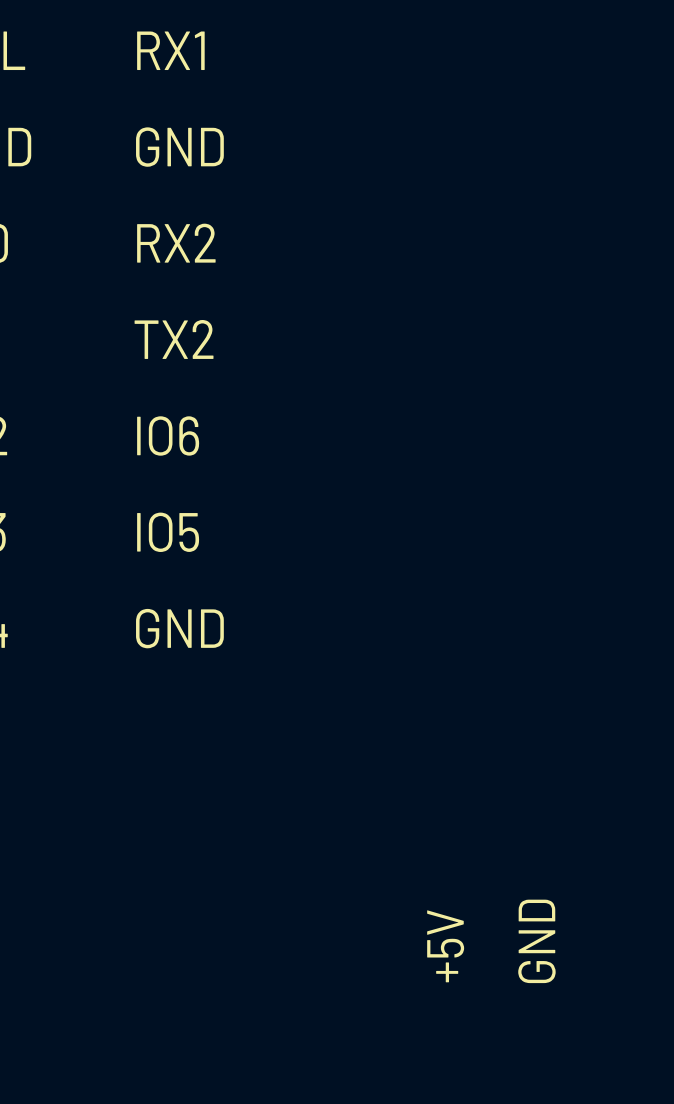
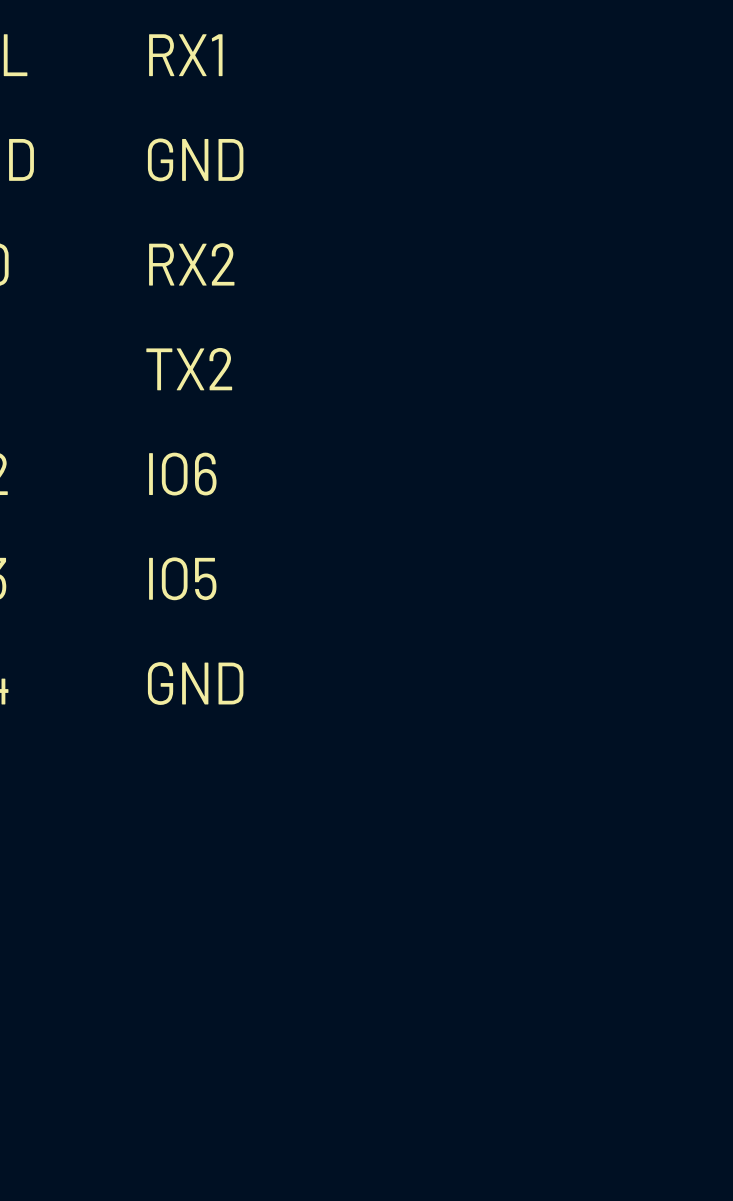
text: GND (536, 941) -> none
text: +5V (445, 946) -> none

